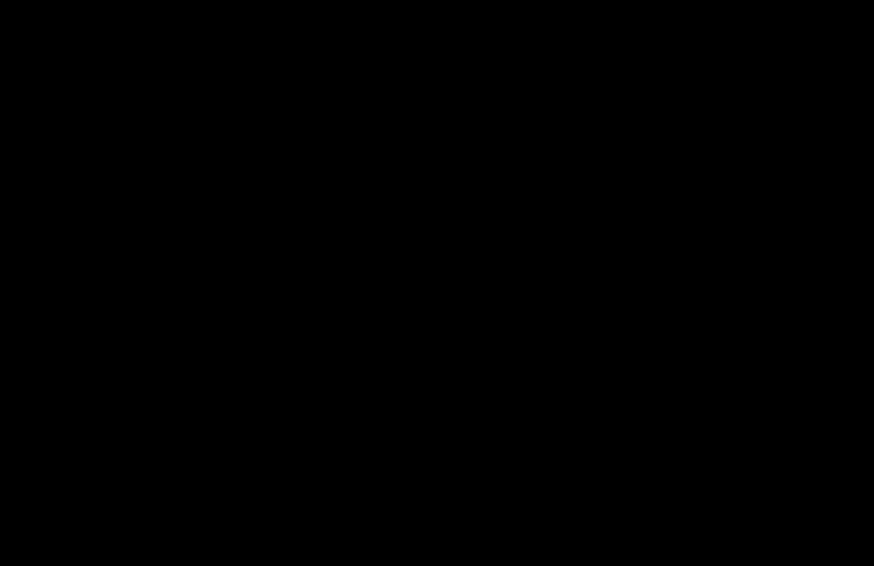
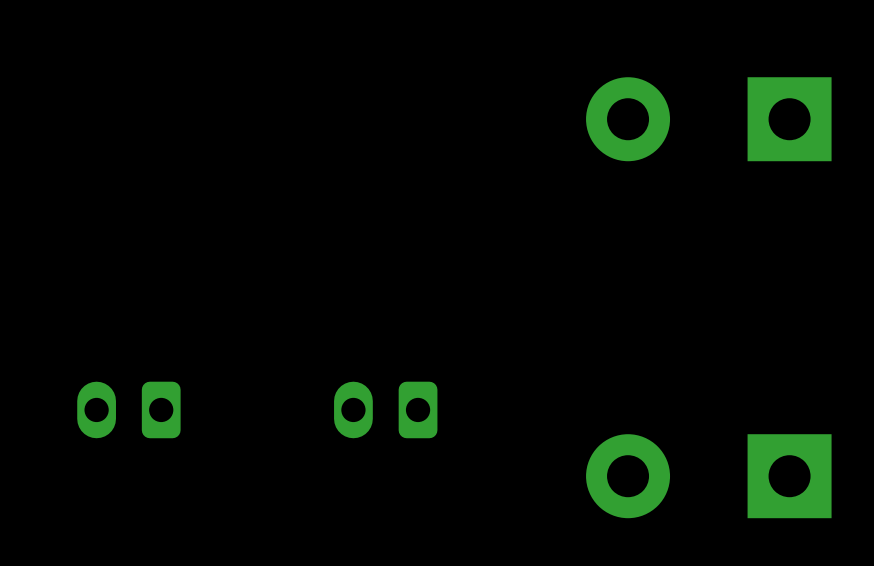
part: none -> (708, 119)
part: none -> (128, 409)
part: none -> (385, 409)
part: none -> (708, 476)

